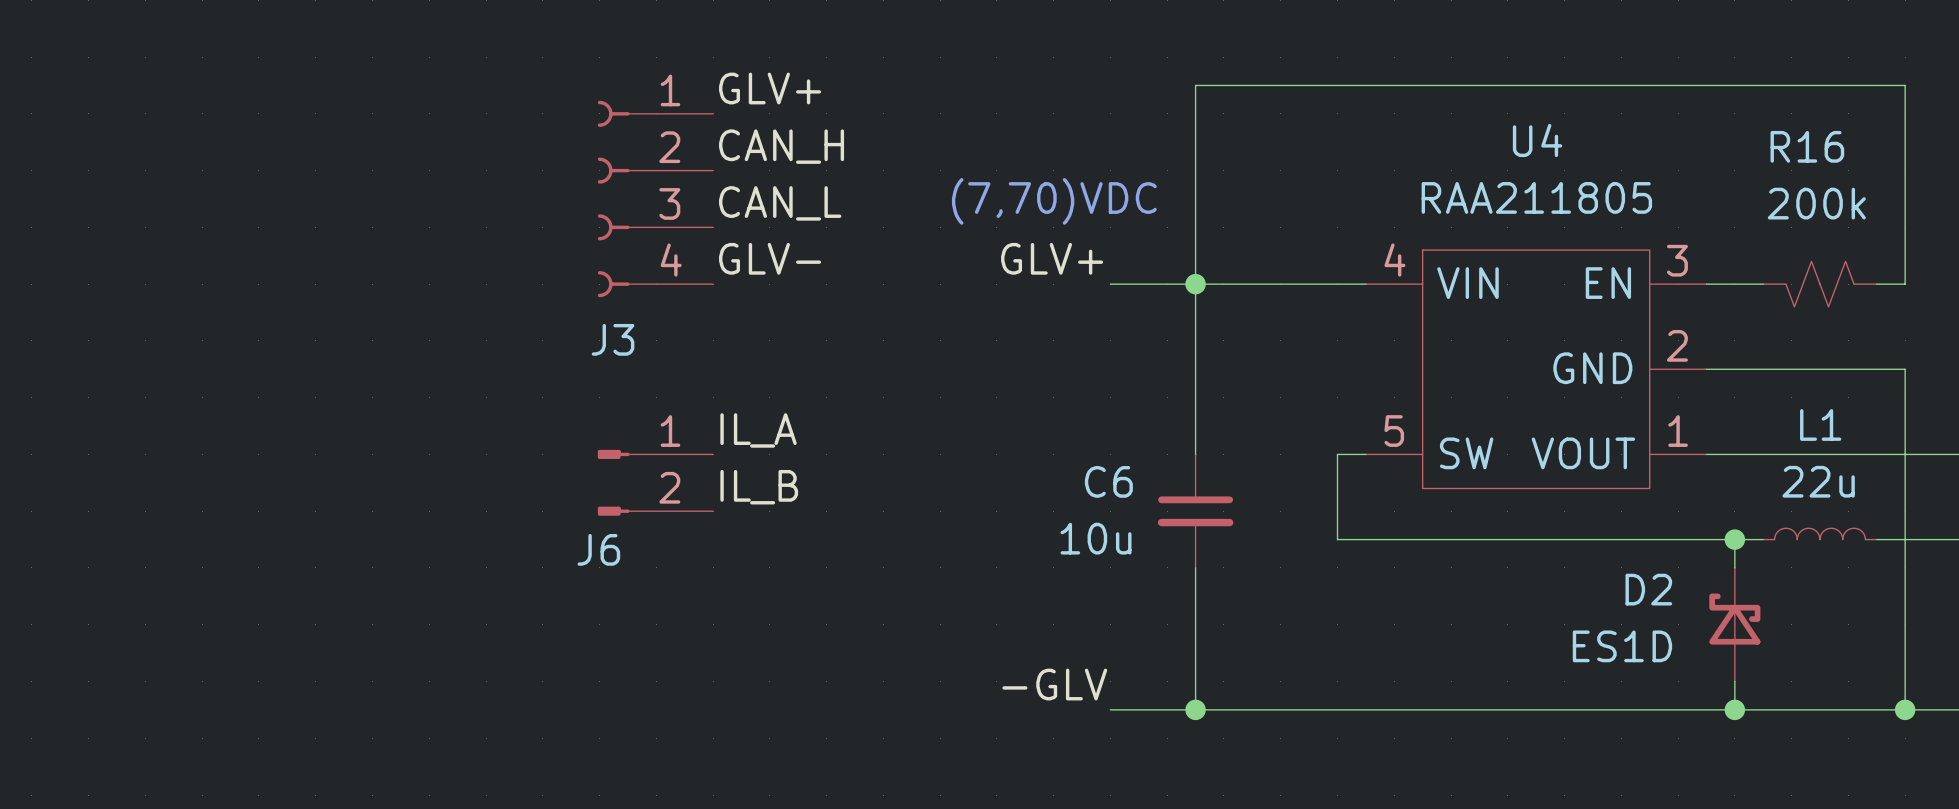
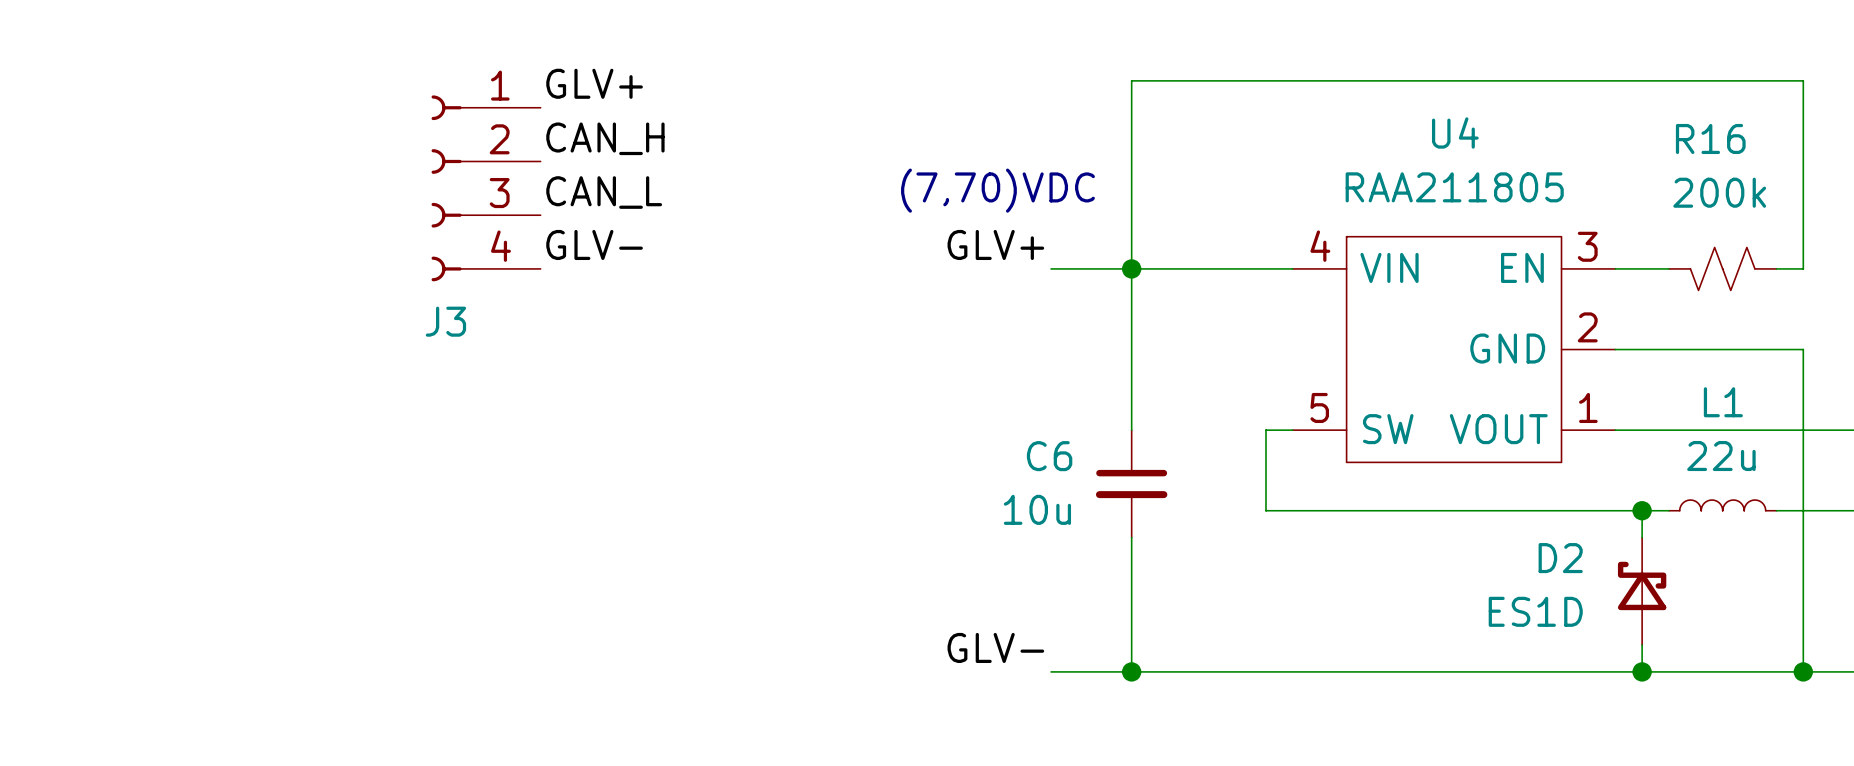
label position: GLV+ (770, 88) -> GLV+ (594, 83)
label position: CAN_H (781, 146) -> CAN_H (605, 138)
J3 position: (655, 198) -> (486, 188)
label position: CAN_L (780, 203) -> CAN_L (604, 192)
label position: GLV- (770, 258) -> GLV- (594, 244)
label: IL_A (758, 430) -> none
J6: (655, 482) -> none
label: IL_B (759, 487) -> none
label: -GLV (1054, 684) -> GLV- (995, 647)

